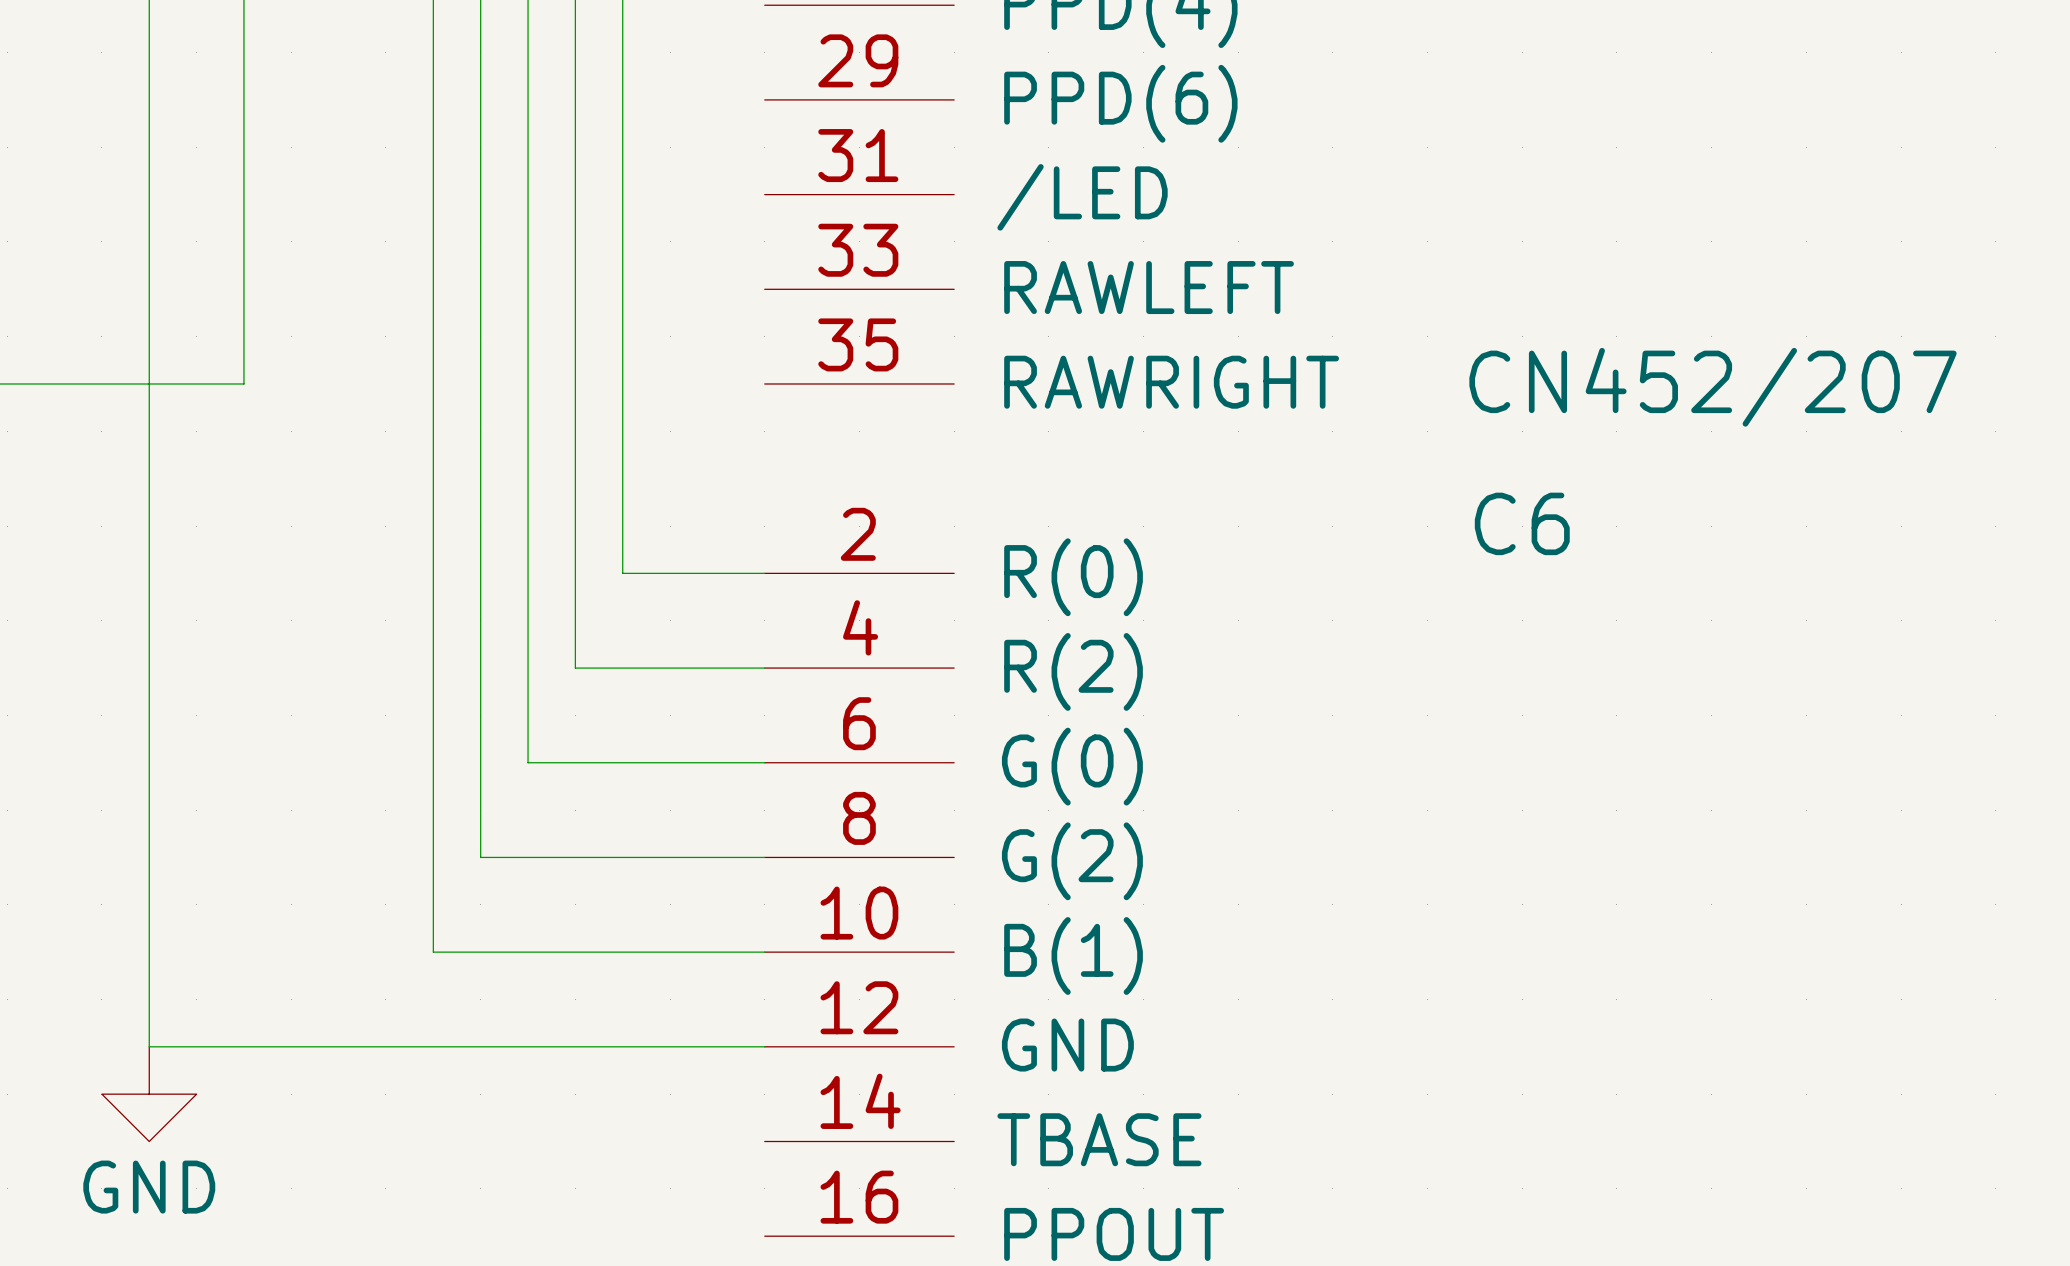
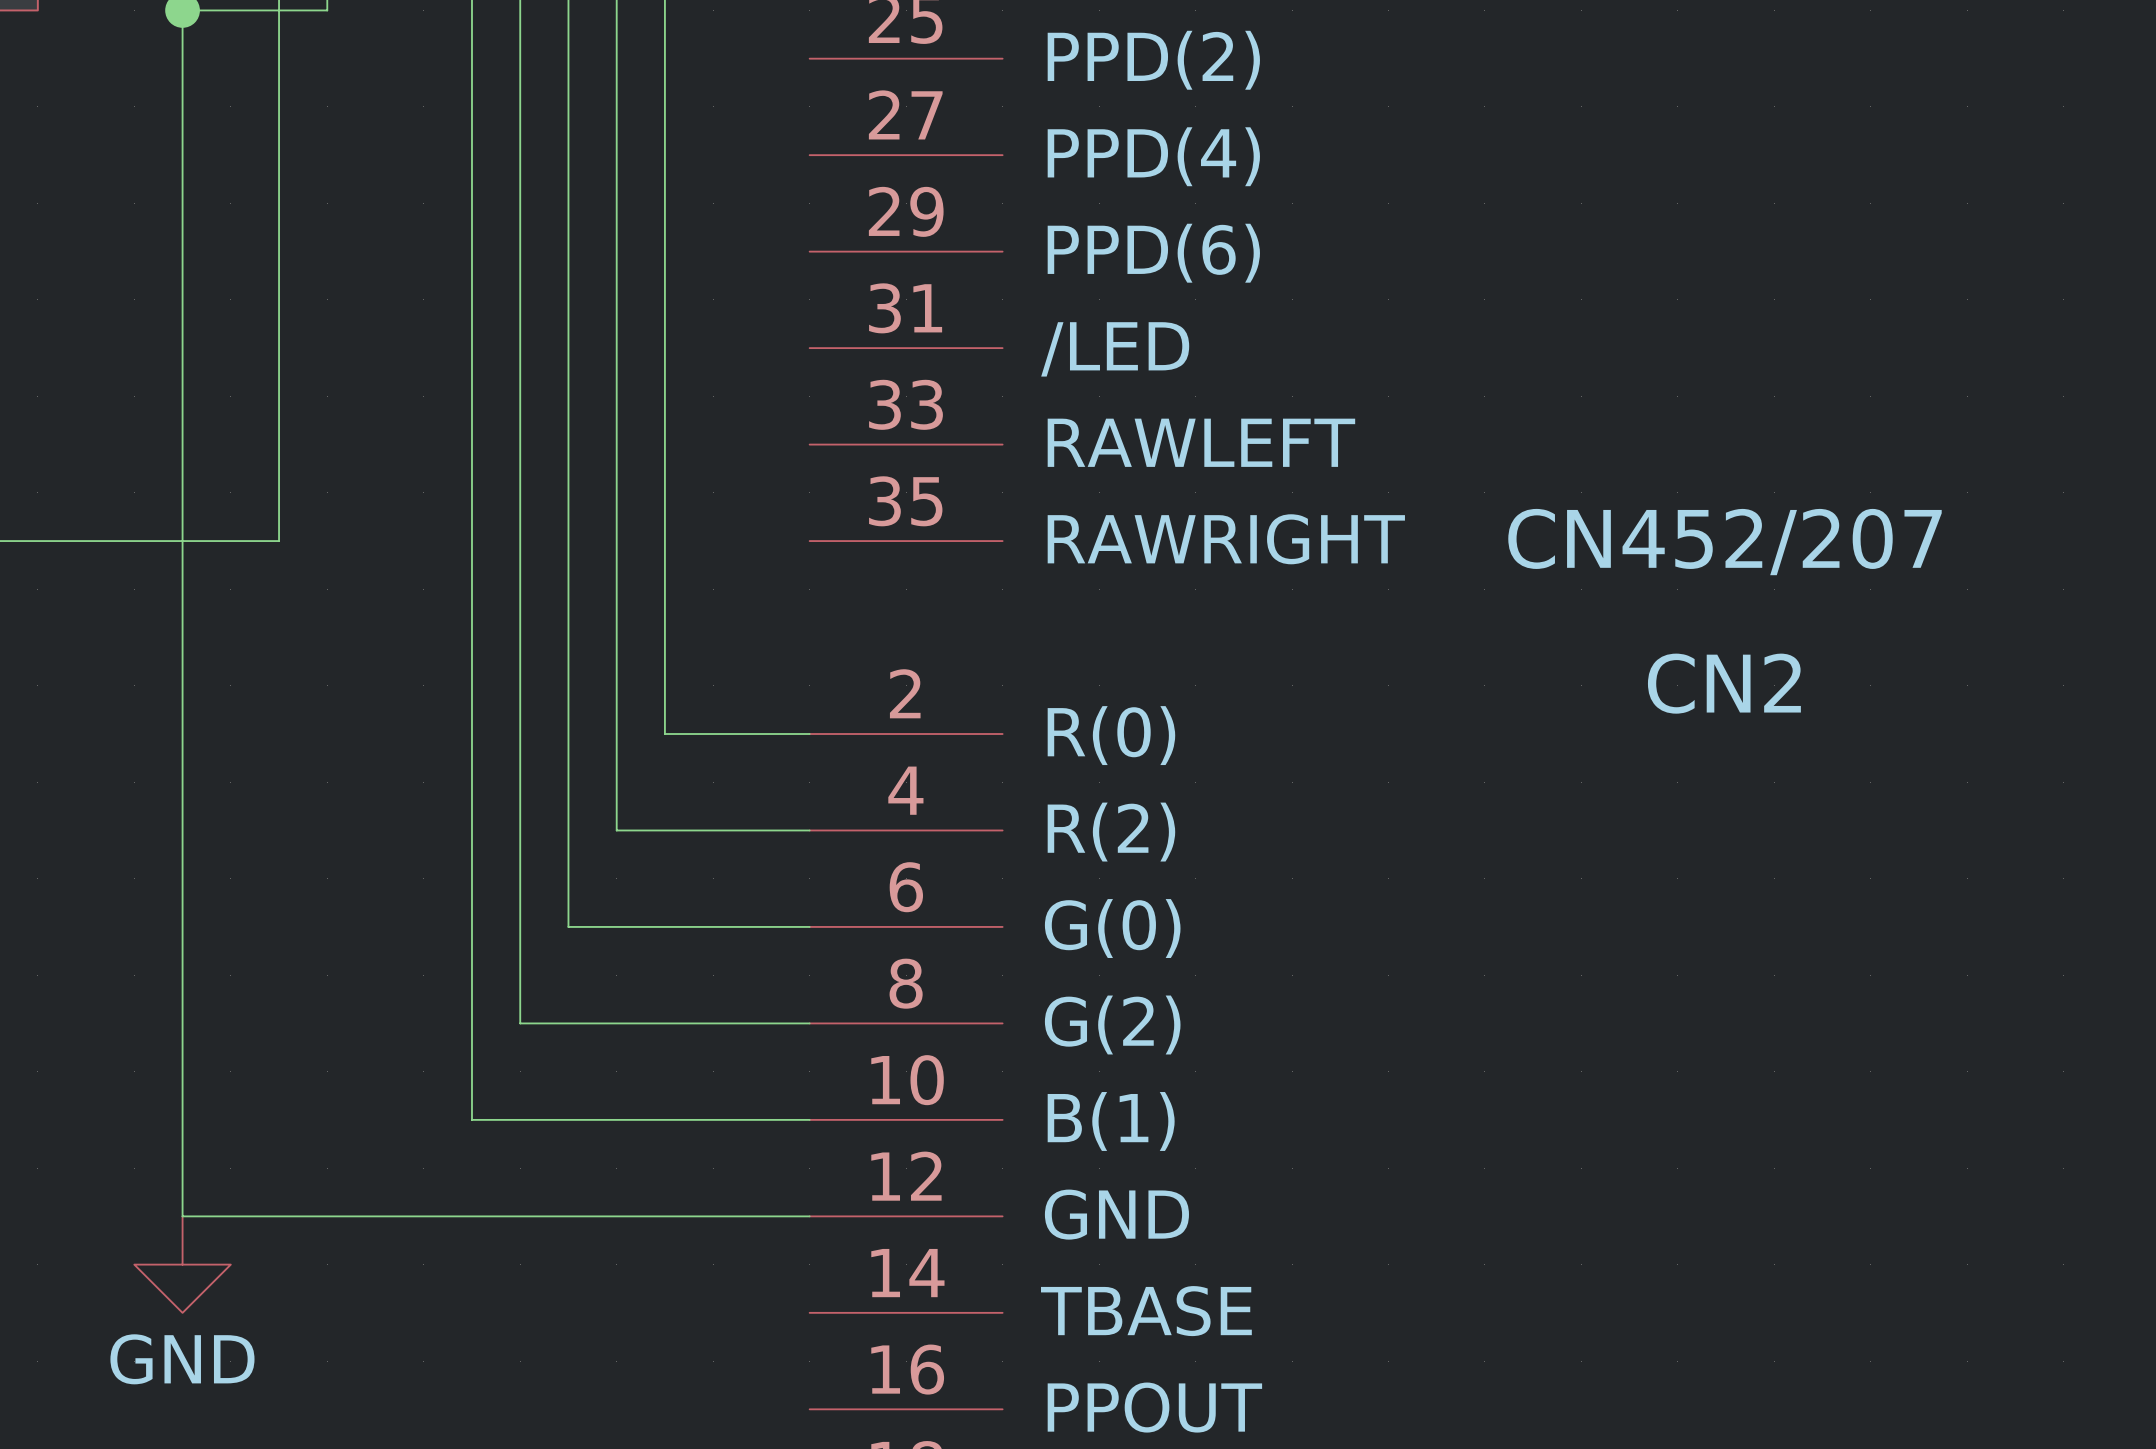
C6 value position: CN452/207 (1713, 387) -> CN452/207 (1724, 542)
C6 name: C6 (1522, 523) -> CN2 (1724, 683)

